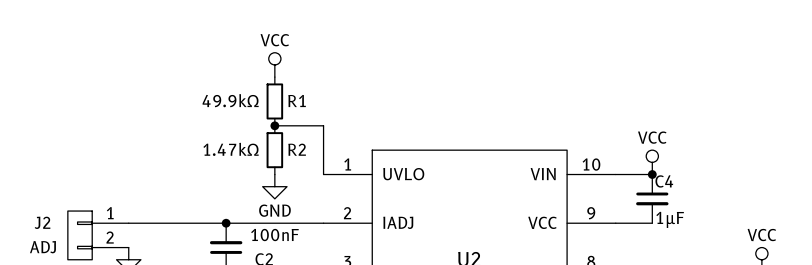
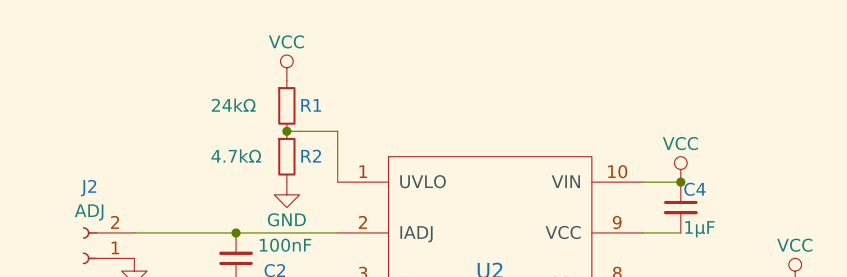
R1 value: 49.9kΩ (230, 100) -> 24kΩ (233, 105)
R2 value: 1.47kΩ (231, 149) -> 4.7kΩ (236, 155)
J2 symbol: [67, 211, 129, 260] -> [82, 227, 135, 265]
J2 name position: J2 (42, 222) -> J2 (88, 188)
J2 value position: ADJ (42, 247) -> ADJ (89, 212)

